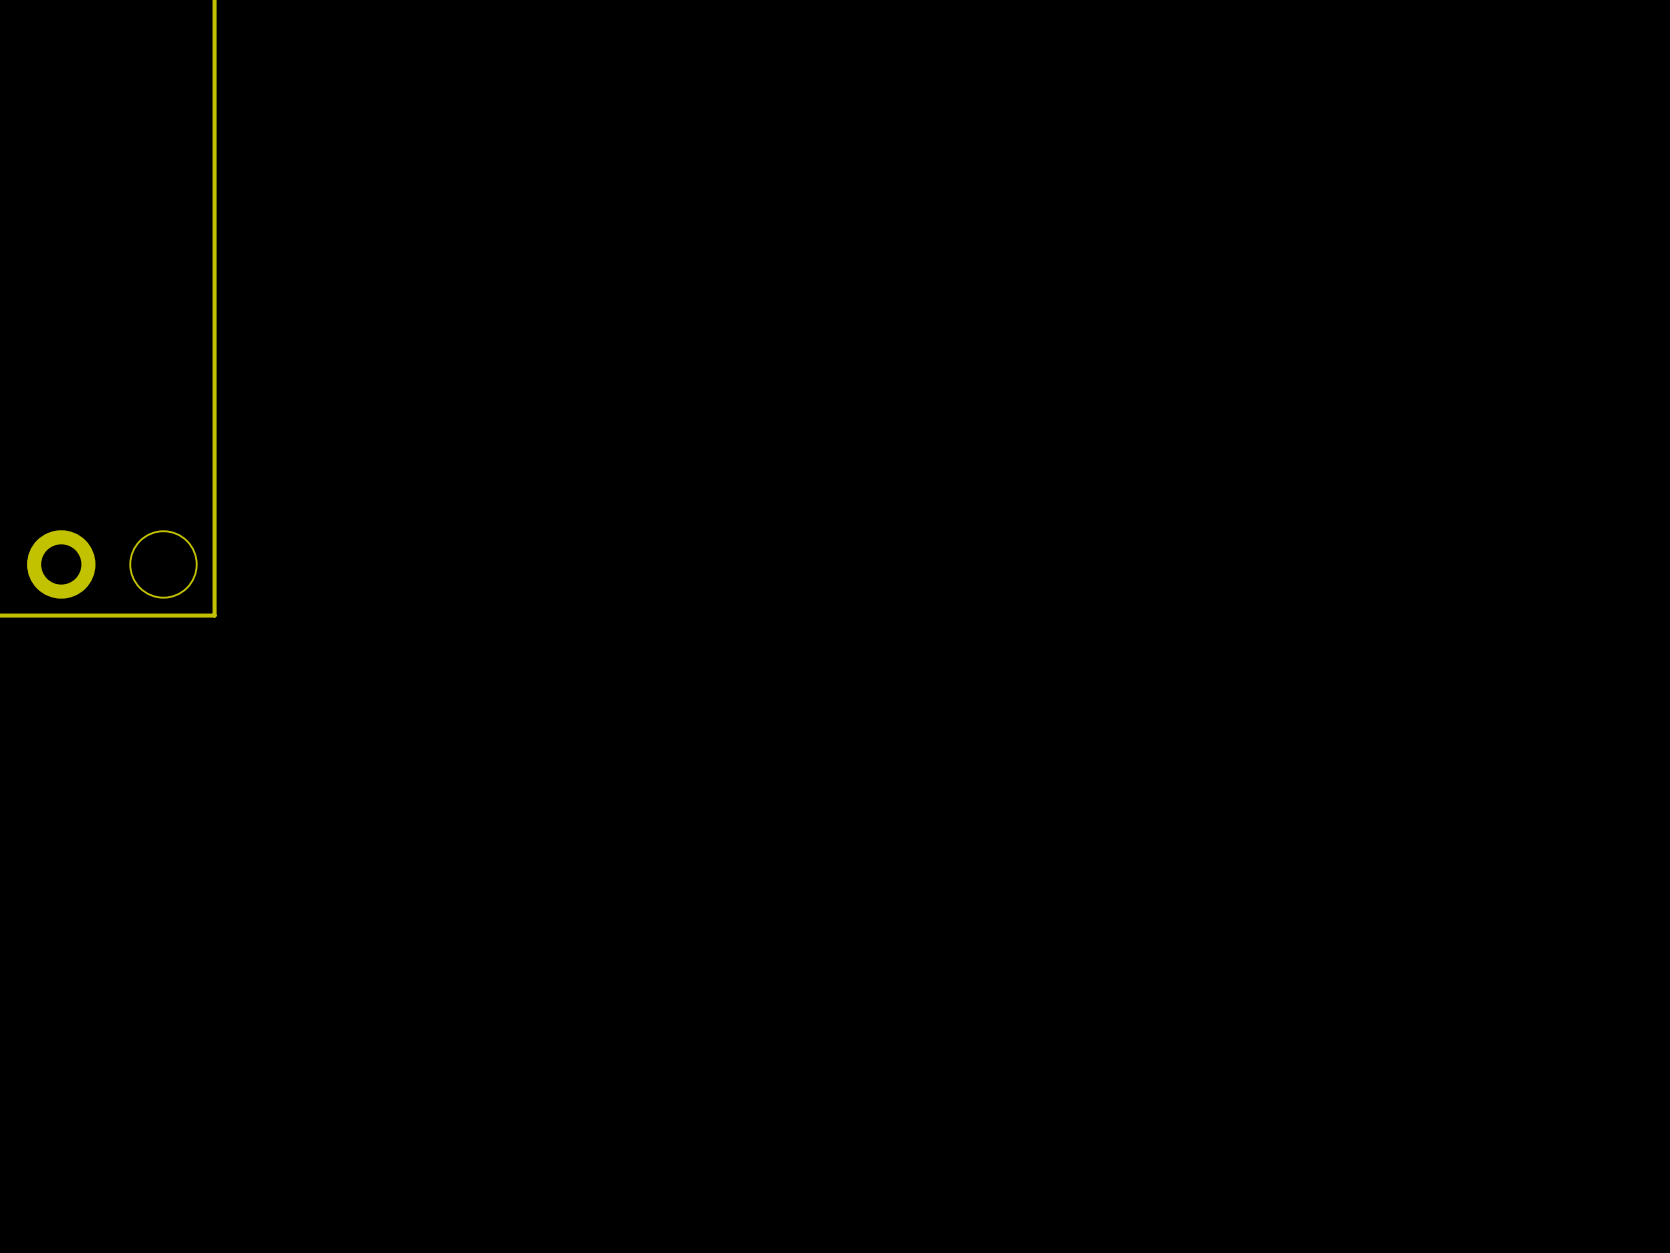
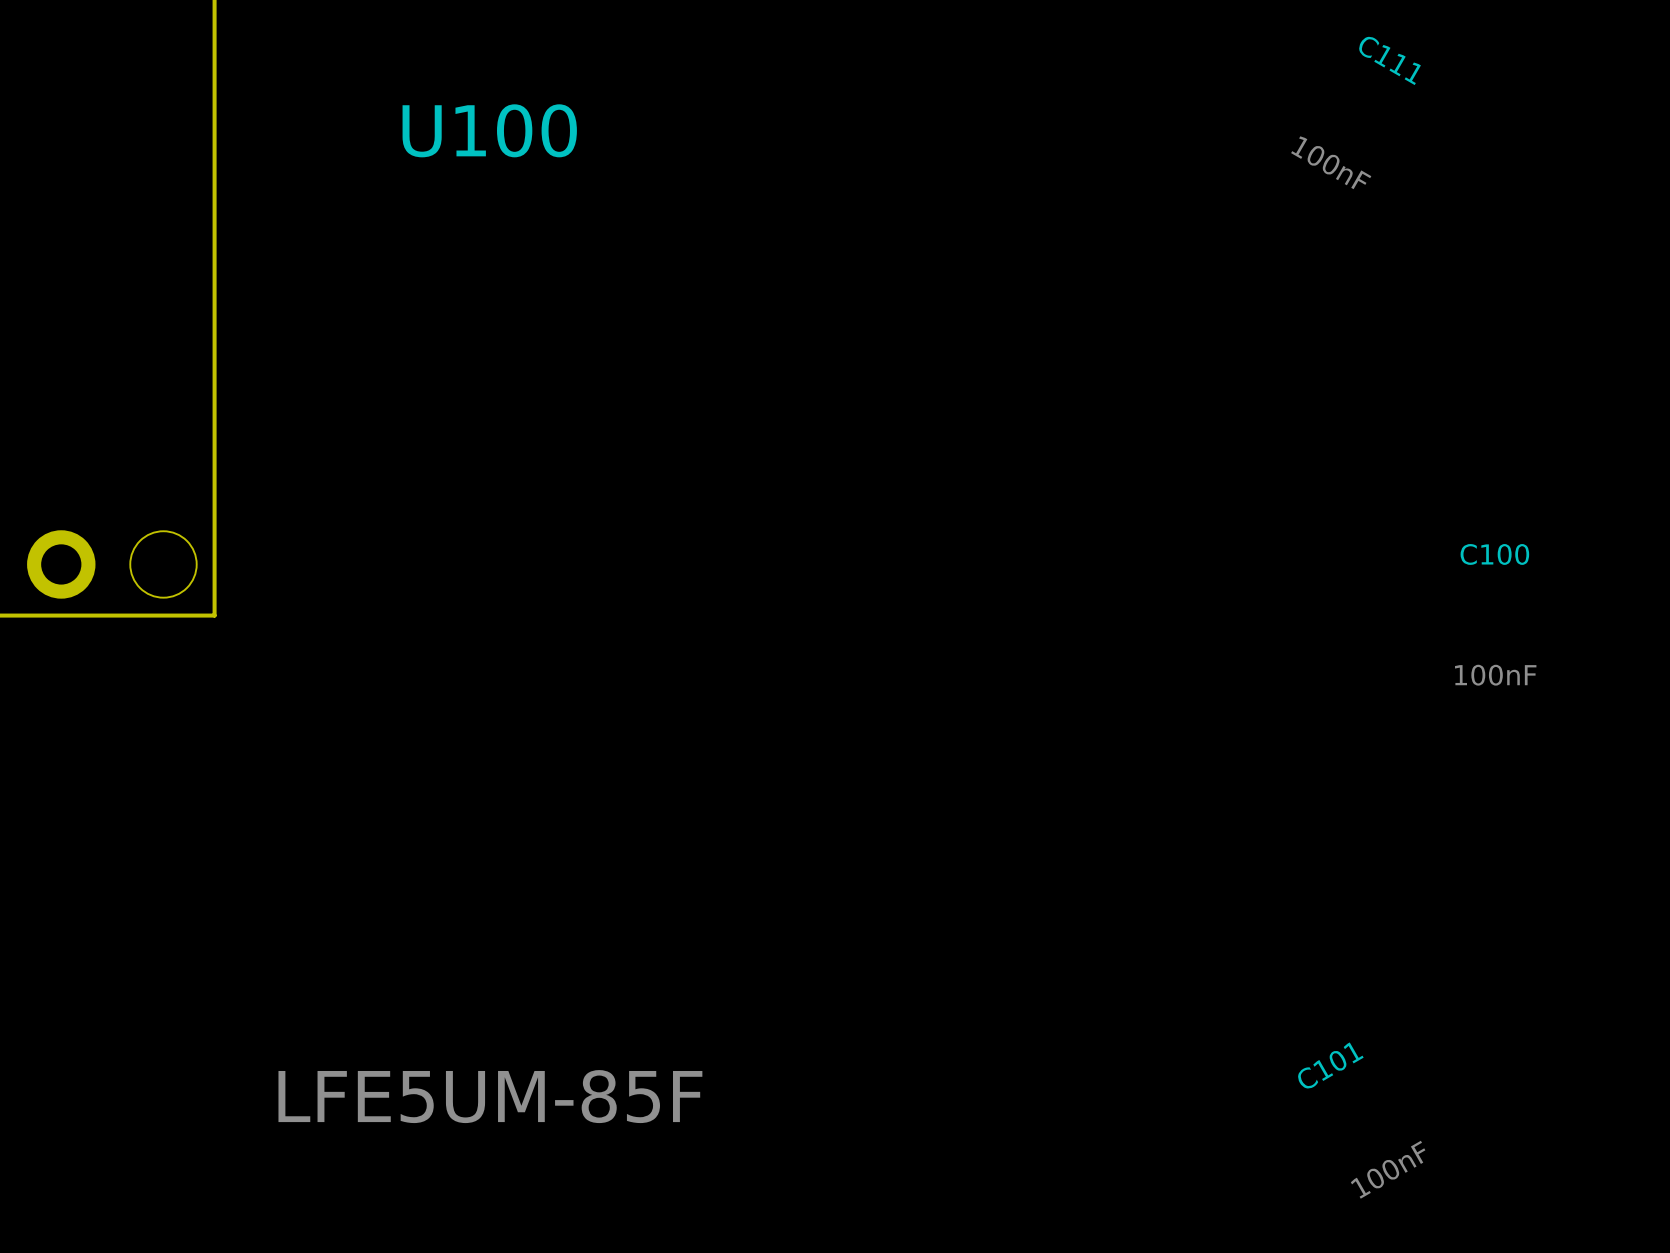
C111: none -> 100nF (1356, 112)
U100: none -> LFE5UM-85F (490, 613)
C100: none -> 100nF (1495, 614)
C101: none -> 100nF (1361, 1120)

